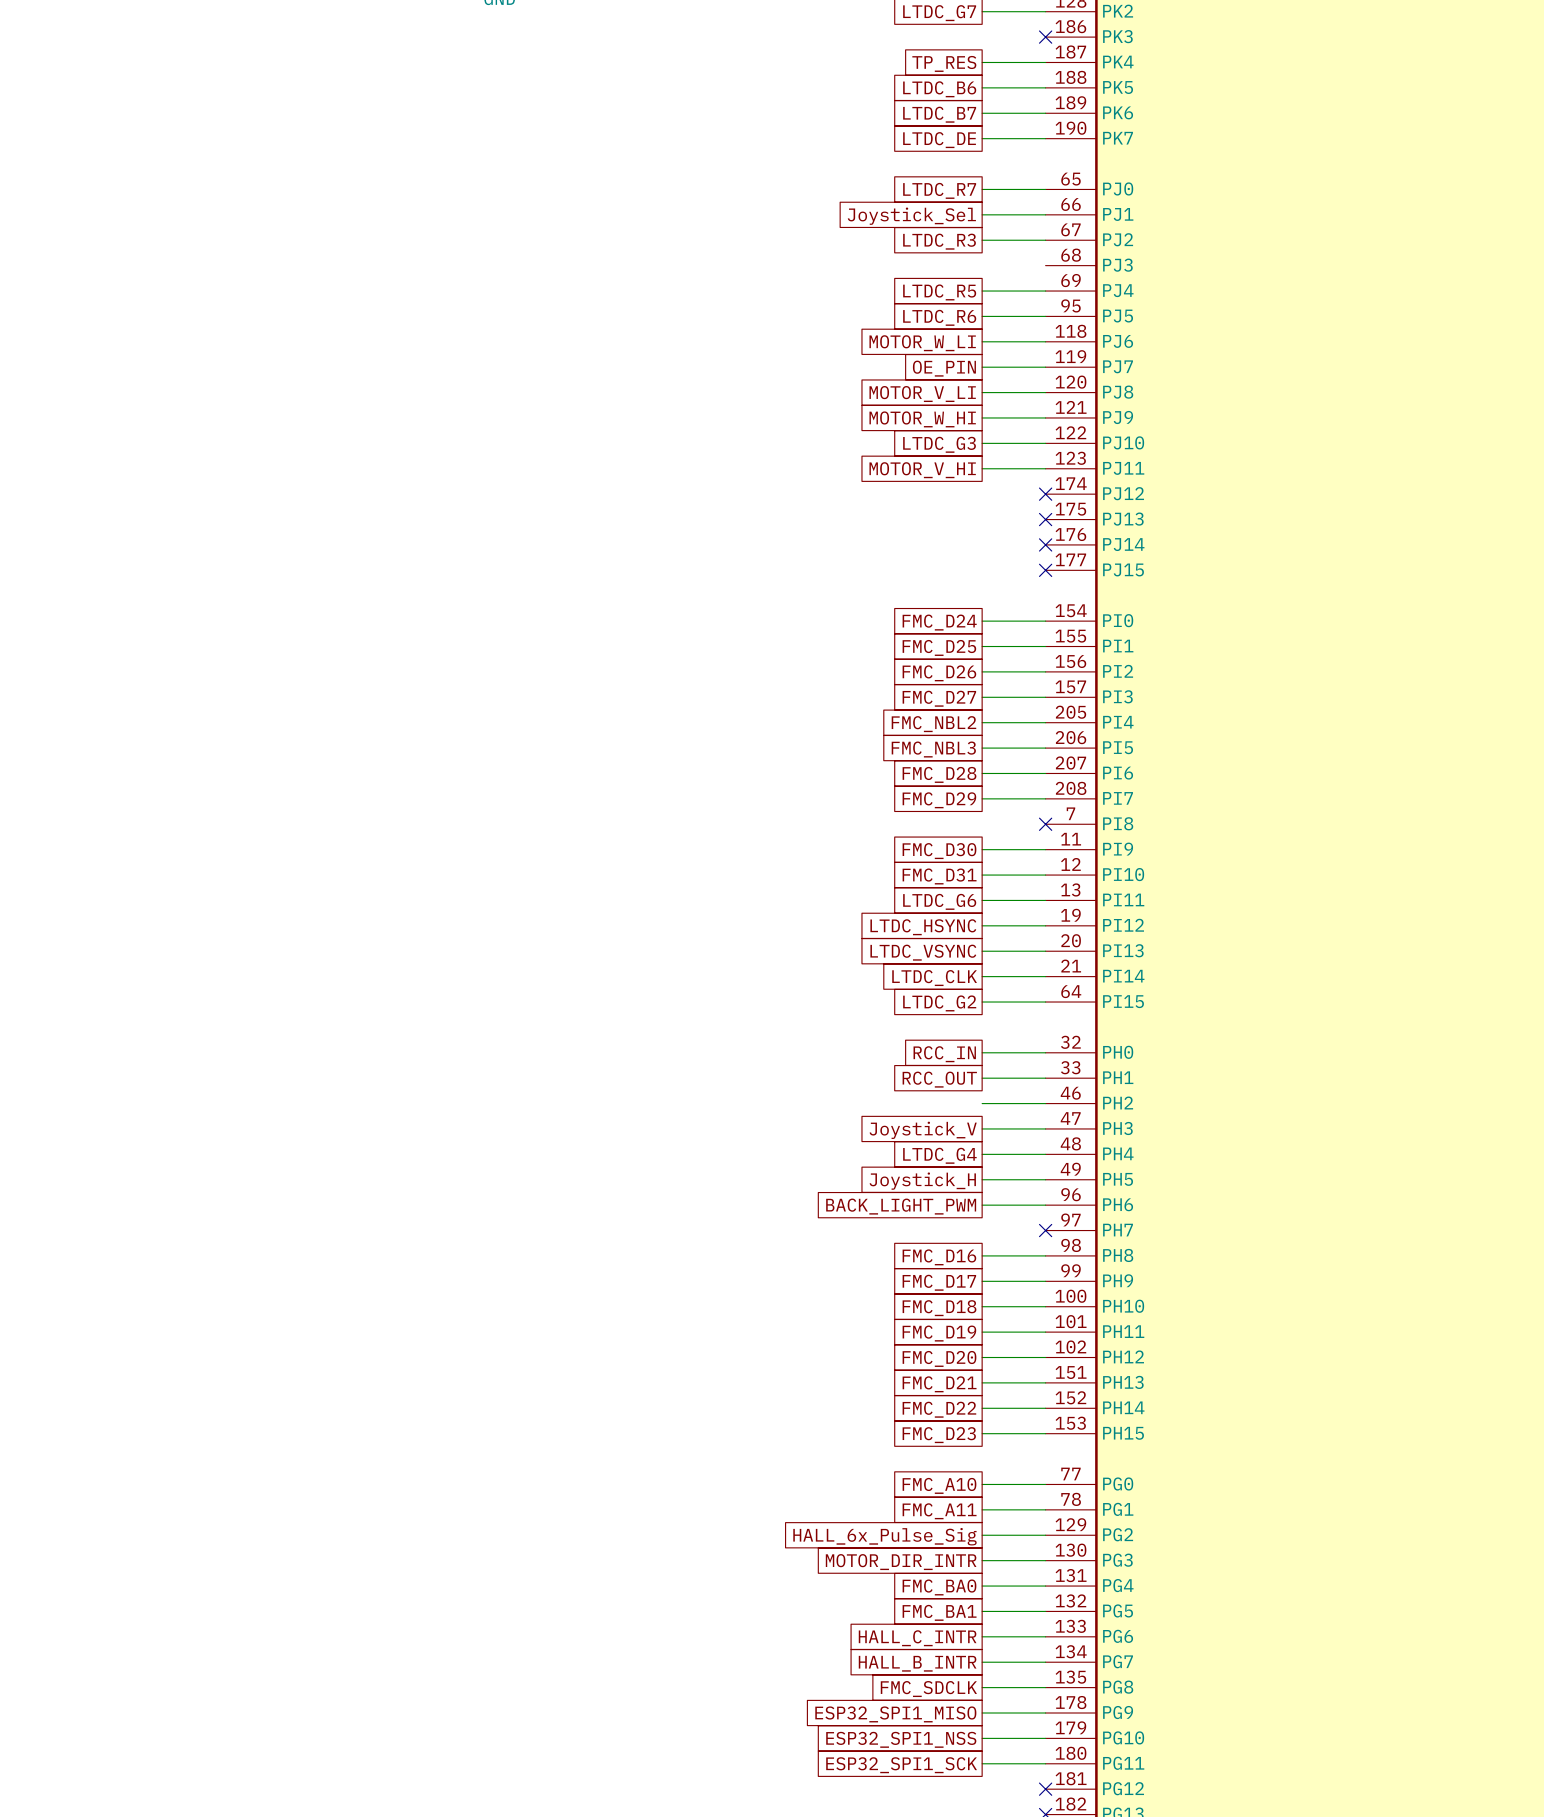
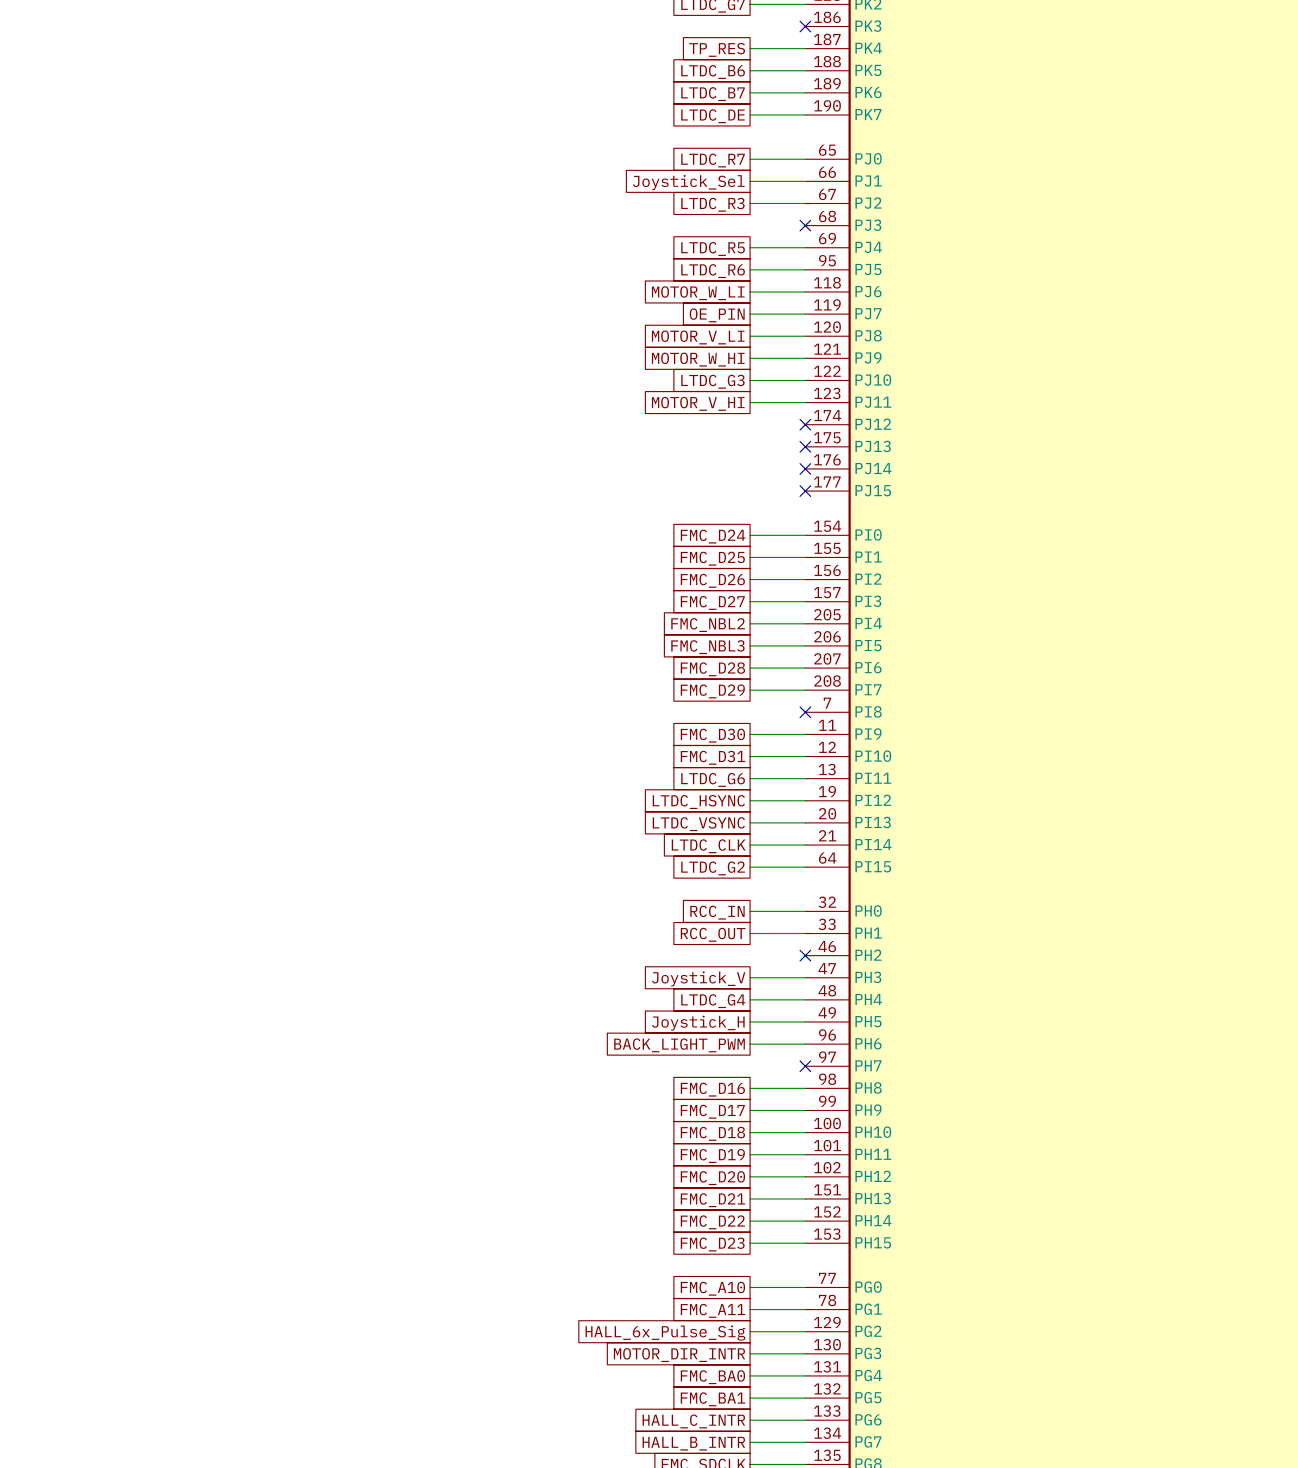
no-connect mark: none -> (805, 225)
wire: (982, 1103) (1045, 1103) -> none
no-connect mark: none -> (805, 955)

